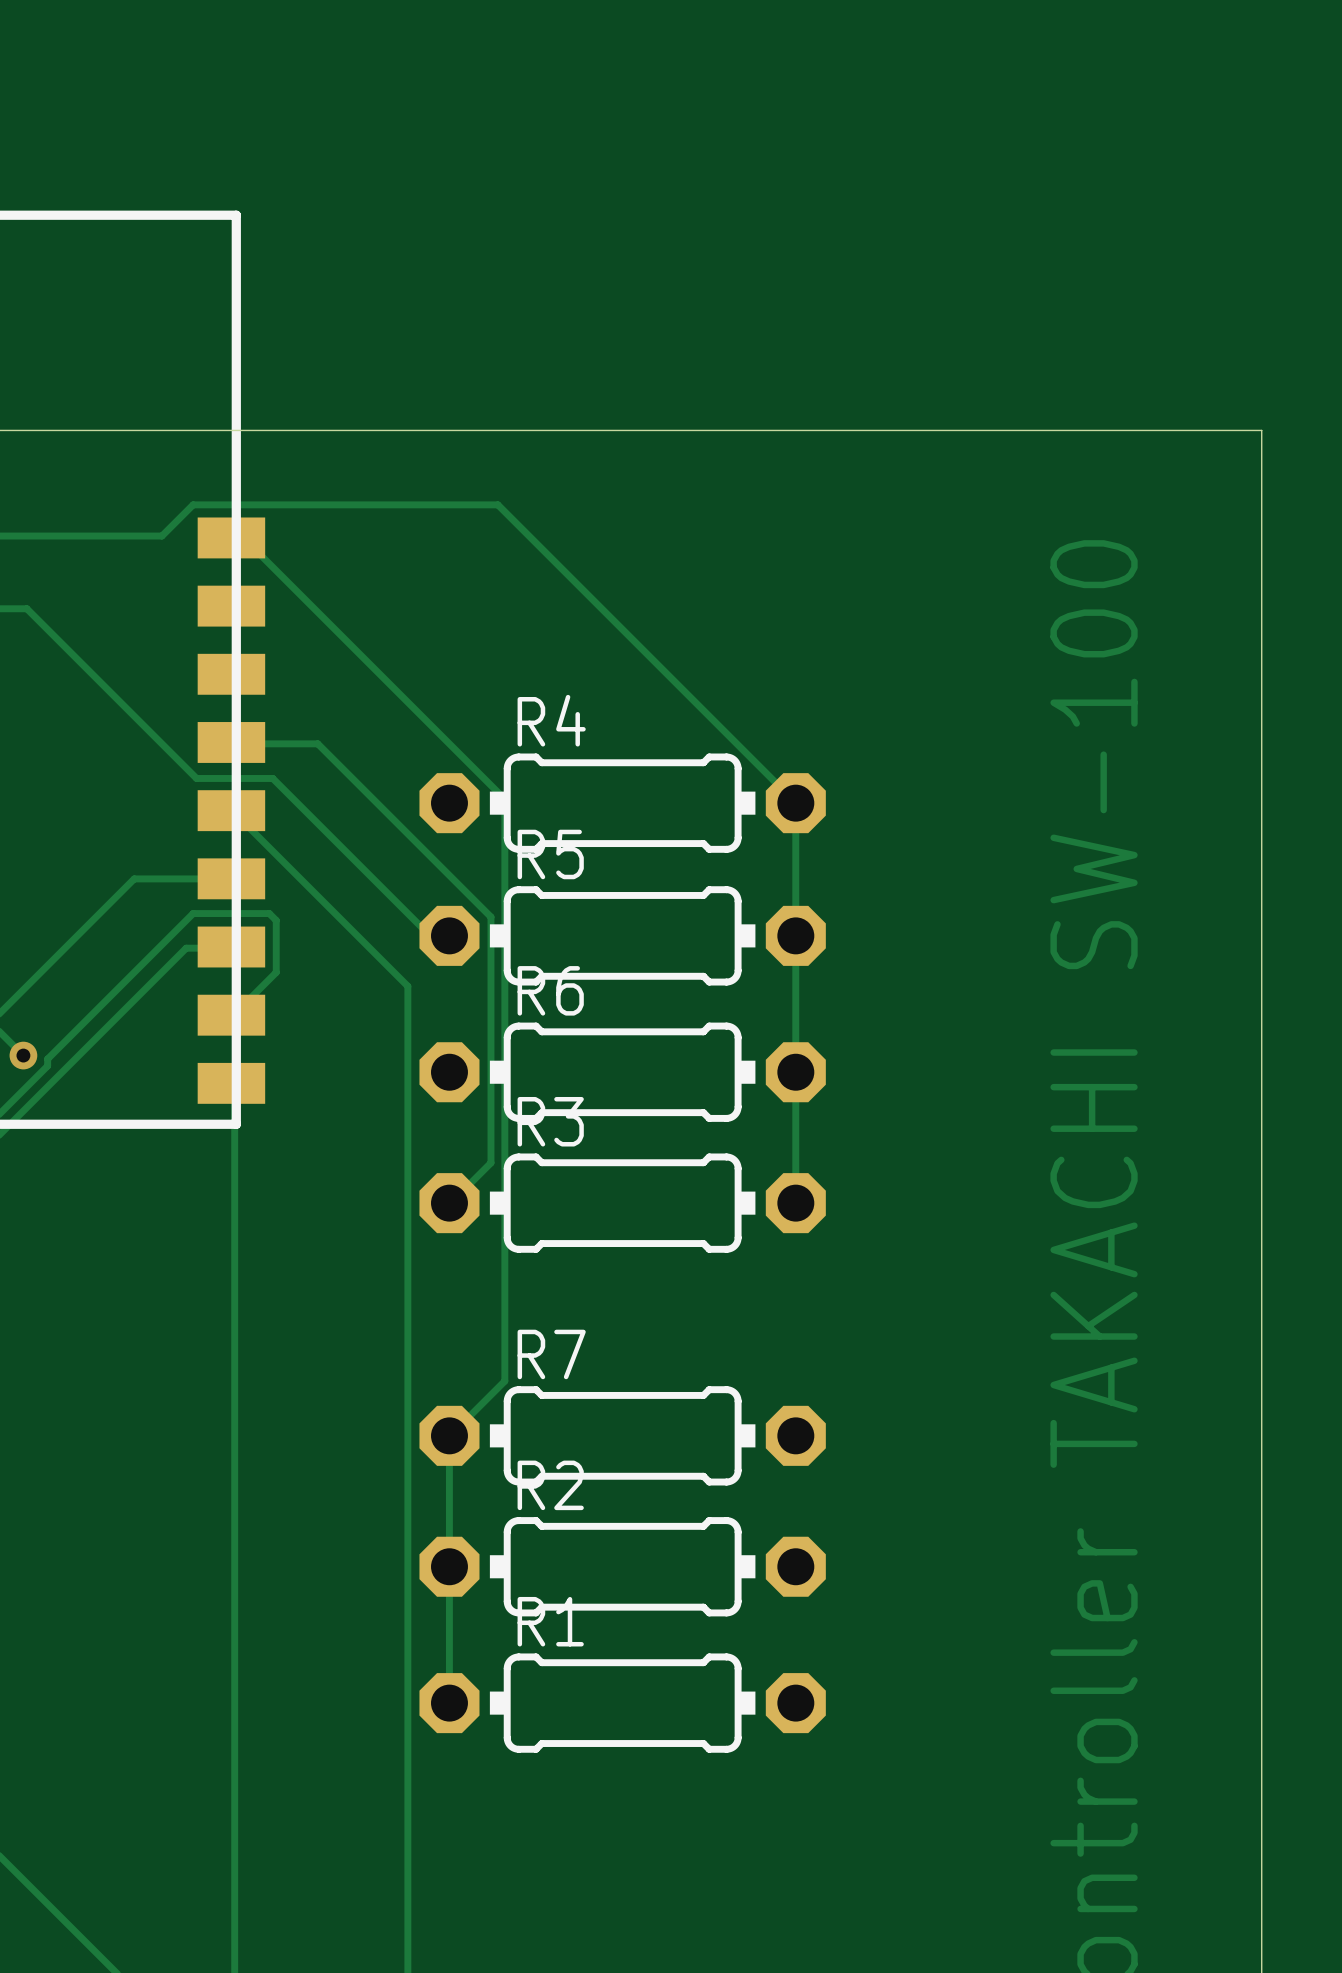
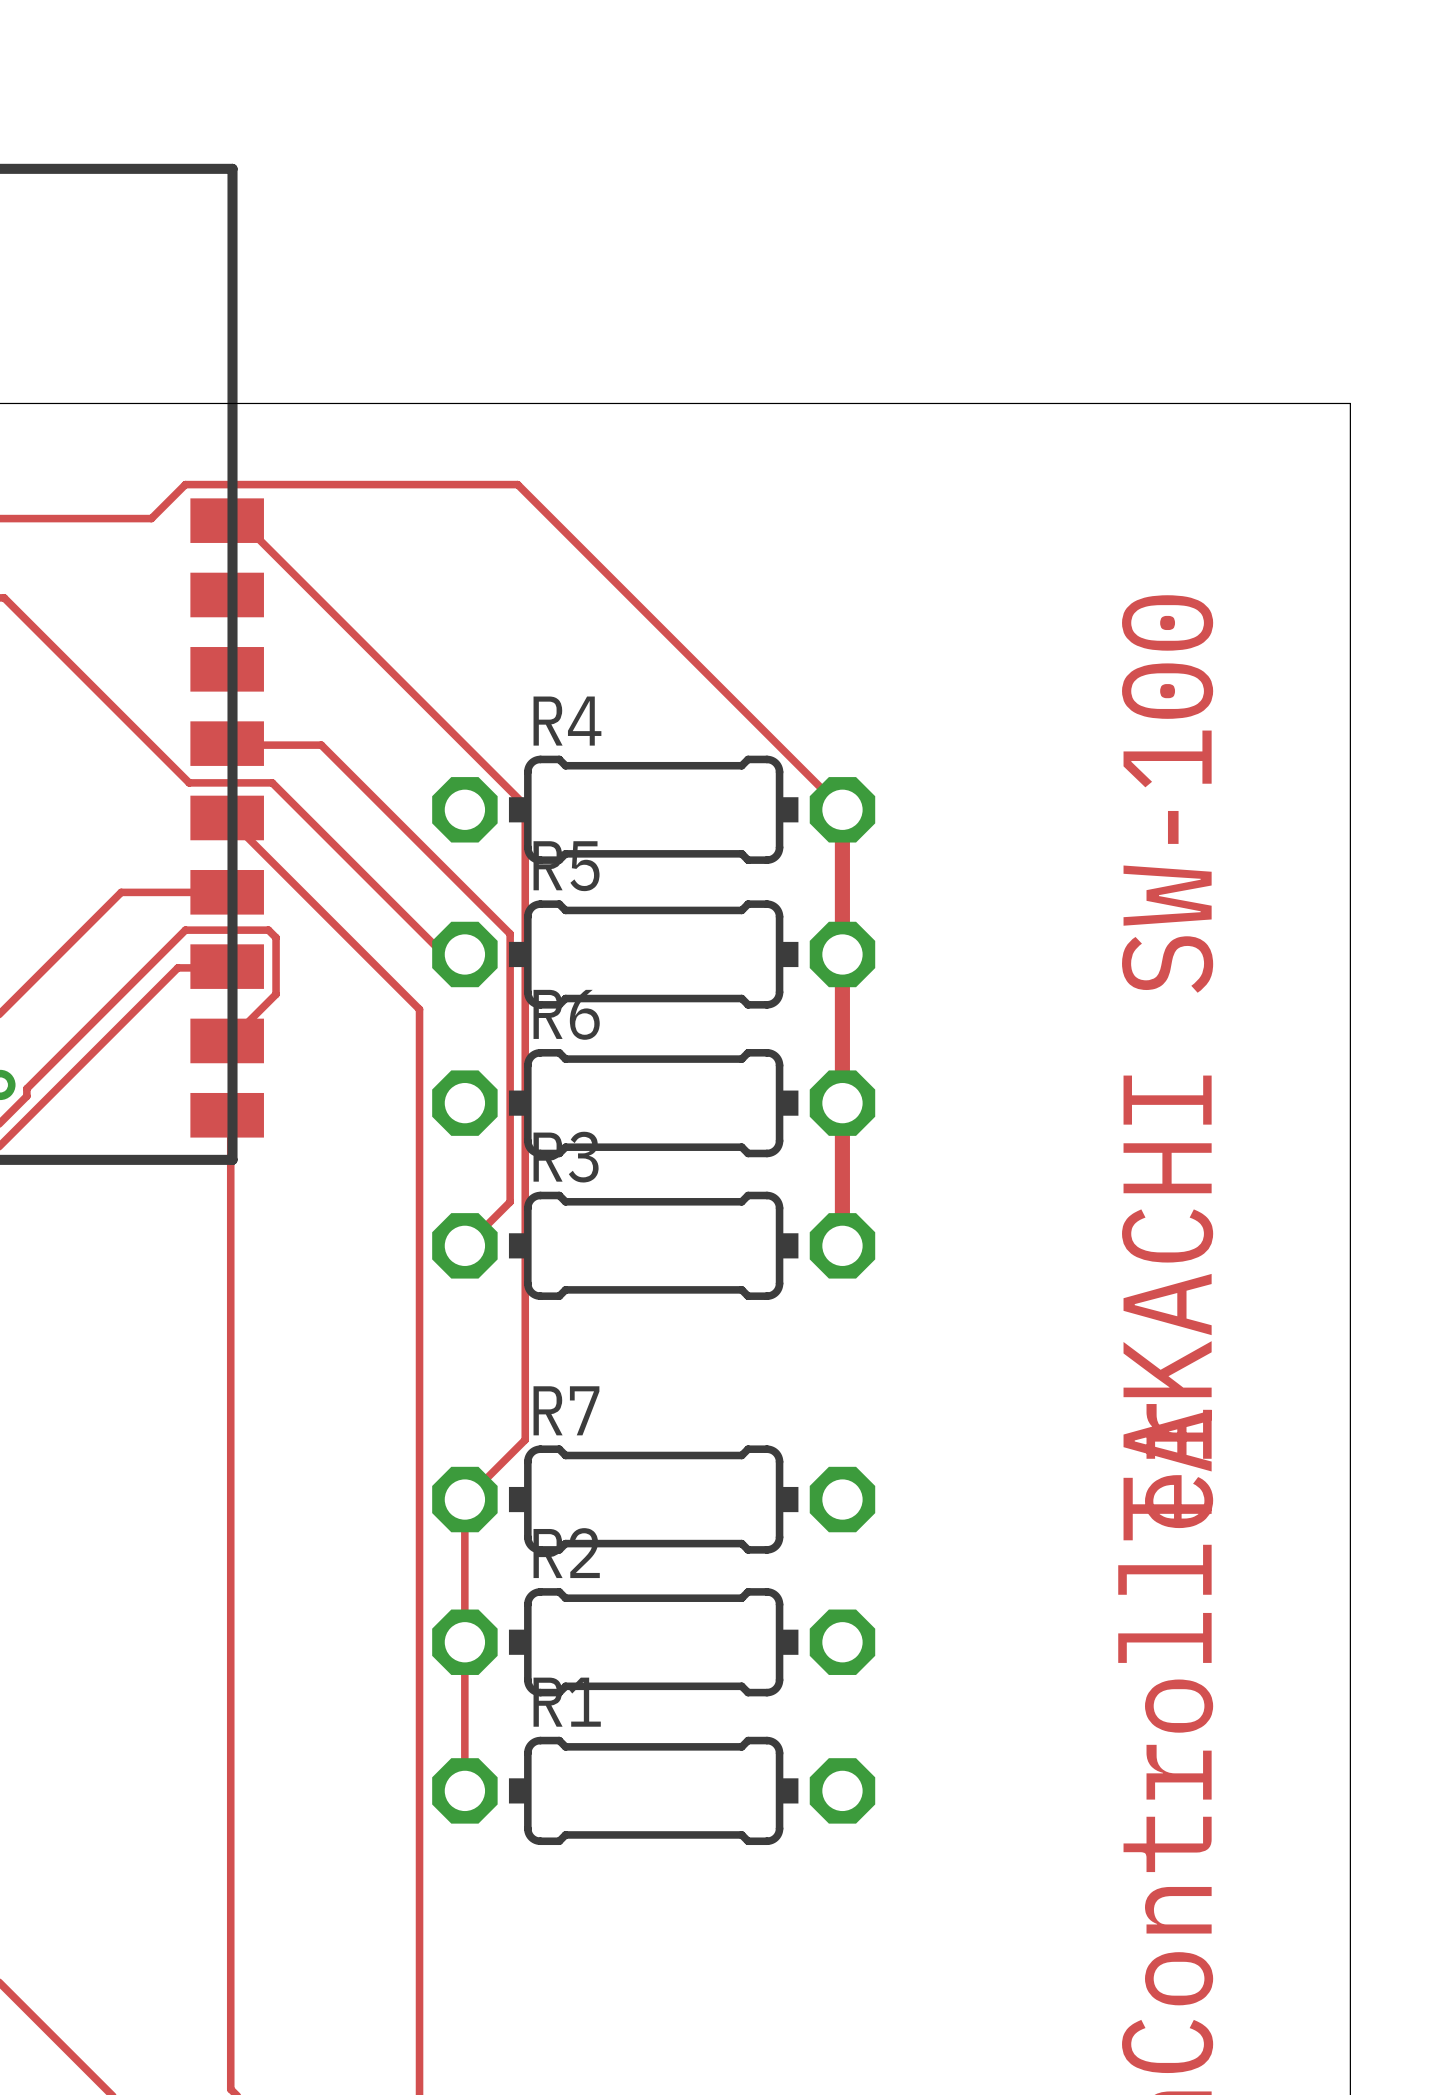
track width: thin (795, 809) (795, 935) -> thick (842, 816) (842, 954)
track width: thin (795, 941) (795, 1065) -> thick (842, 960) (842, 1096)
track width: thin (795, 1072) (795, 1197) -> thick (842, 1103) (842, 1239)

